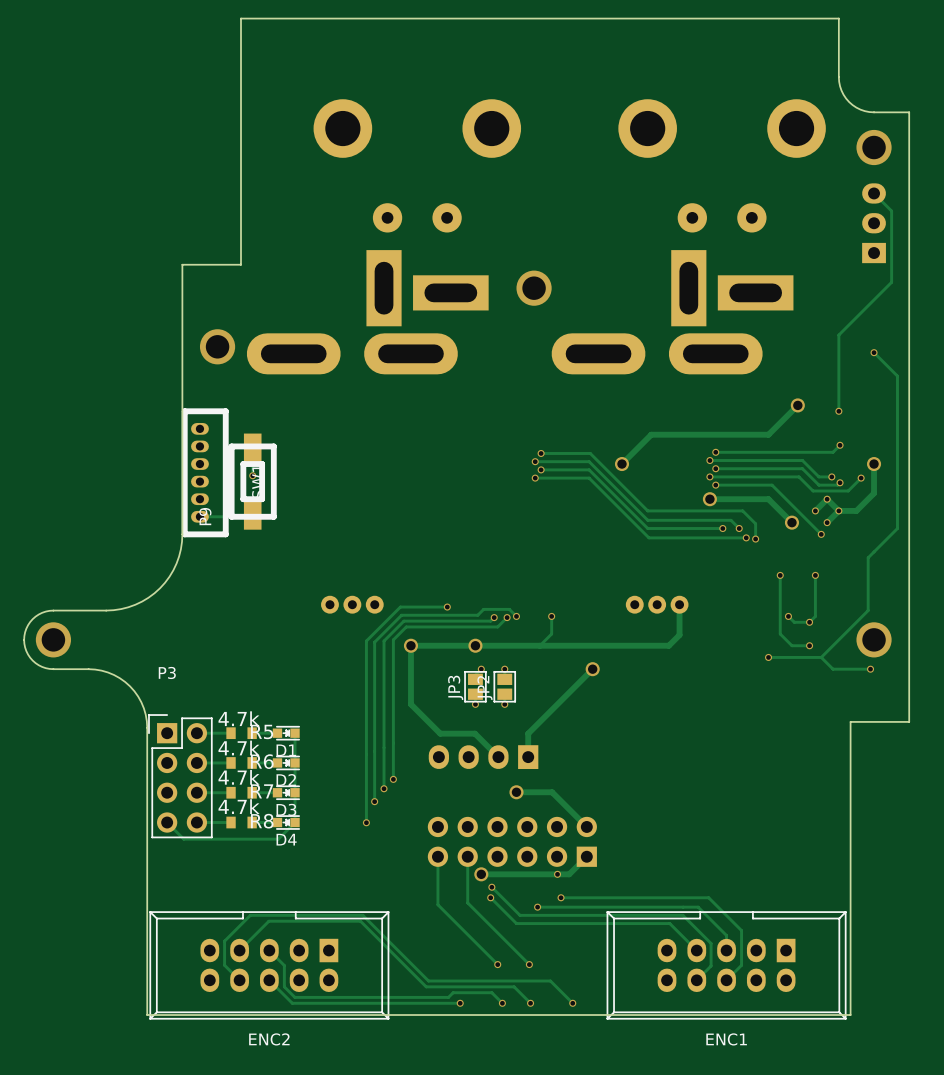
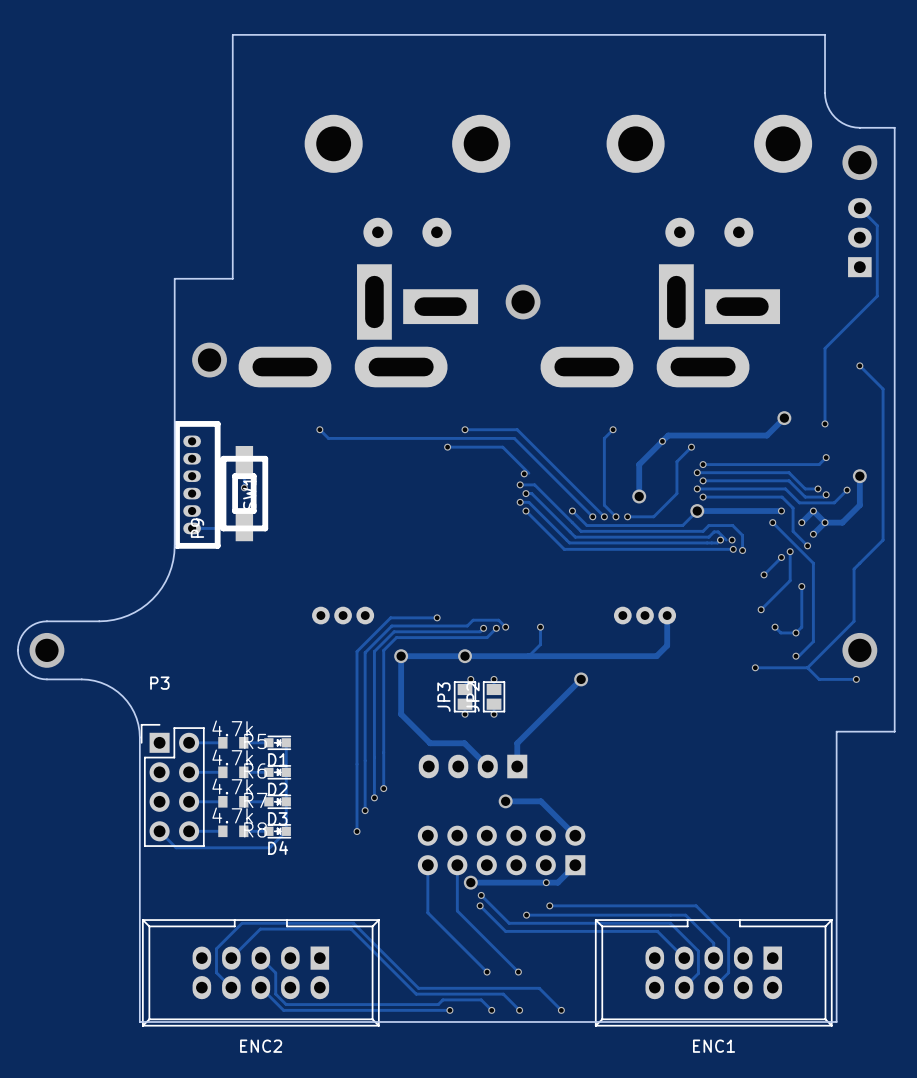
track: none -> (319, 429) (328, 438) (514, 438) (592, 516)
via: none -> (319, 429)
via: none -> (465, 429)
track: none -> (613, 429) (604, 438) (604, 505) (615, 516)
via: none -> (613, 429)
track: (780, 423) (768, 434) (651, 434) (621, 464) -> (766, 435) (668, 435) (639, 464) (639, 496)
via: none -> (662, 441)
track: none -> (447, 447) (502, 447) (528, 473)
via: none -> (447, 447)
track: none -> (691, 447) (676, 461) (676, 493) (653, 516) (627, 516)
via: none -> (691, 447)
track: (541, 453) (590, 453) (647, 510) (742, 510) (745, 513) -> (520, 484) (534, 484) (581, 531) (703, 531) (708, 525) (732, 525)
via: (541, 453) -> none
track: (535, 461) (589, 461) (647, 520) (726, 520) -> (525, 493) (531, 493) (575, 537) (708, 537) (714, 531)
via position: (621, 464) -> (639, 496)
track: (541, 469) (589, 469) (647, 528) (722, 528) -> none
via: (541, 469) -> none
via: none -> (520, 484)
track: (535, 478) (589, 478) -> (465, 429) (517, 429) (577, 490)
via: (535, 478) -> none
via: none -> (525, 493)
track: (772, 485) (806, 519) -> (758, 497) (782, 497) (793, 508) (793, 531)
track: none -> (520, 502) (528, 502) (569, 542) (717, 542) (720, 540)
via: none -> (520, 502)
via: none -> (525, 511)
track: none -> (572, 511) (586, 525) (682, 525) (697, 511)
via: none -> (572, 511)
track: (768, 499) (791, 522) -> (755, 511) (781, 511)
via: none -> (781, 511)
via: none -> (592, 516)
track: (616, 505) (648, 537) -> (525, 511) (564, 549) (636, 549)
via: none -> (604, 516)
via: none -> (615, 516)
via: none -> (627, 516)
track: none -> (772, 522) (813, 563) (813, 641) (798, 656)
via: none -> (772, 522)
via: (791, 522) -> none
via: (722, 528) -> none
via: none -> (720, 540)
via: (739, 528) -> none
via: none -> (732, 540)
track: none -> (790, 551) (790, 580) (761, 609)
via: none -> (790, 551)
track: none -> (781, 557) (764, 574)
via: none -> (781, 557)
via: none -> (764, 574)
track: (780, 575) (780, 634) (791, 645) (809, 645) -> none
via: (780, 575) -> none
via: none -> (761, 609)

